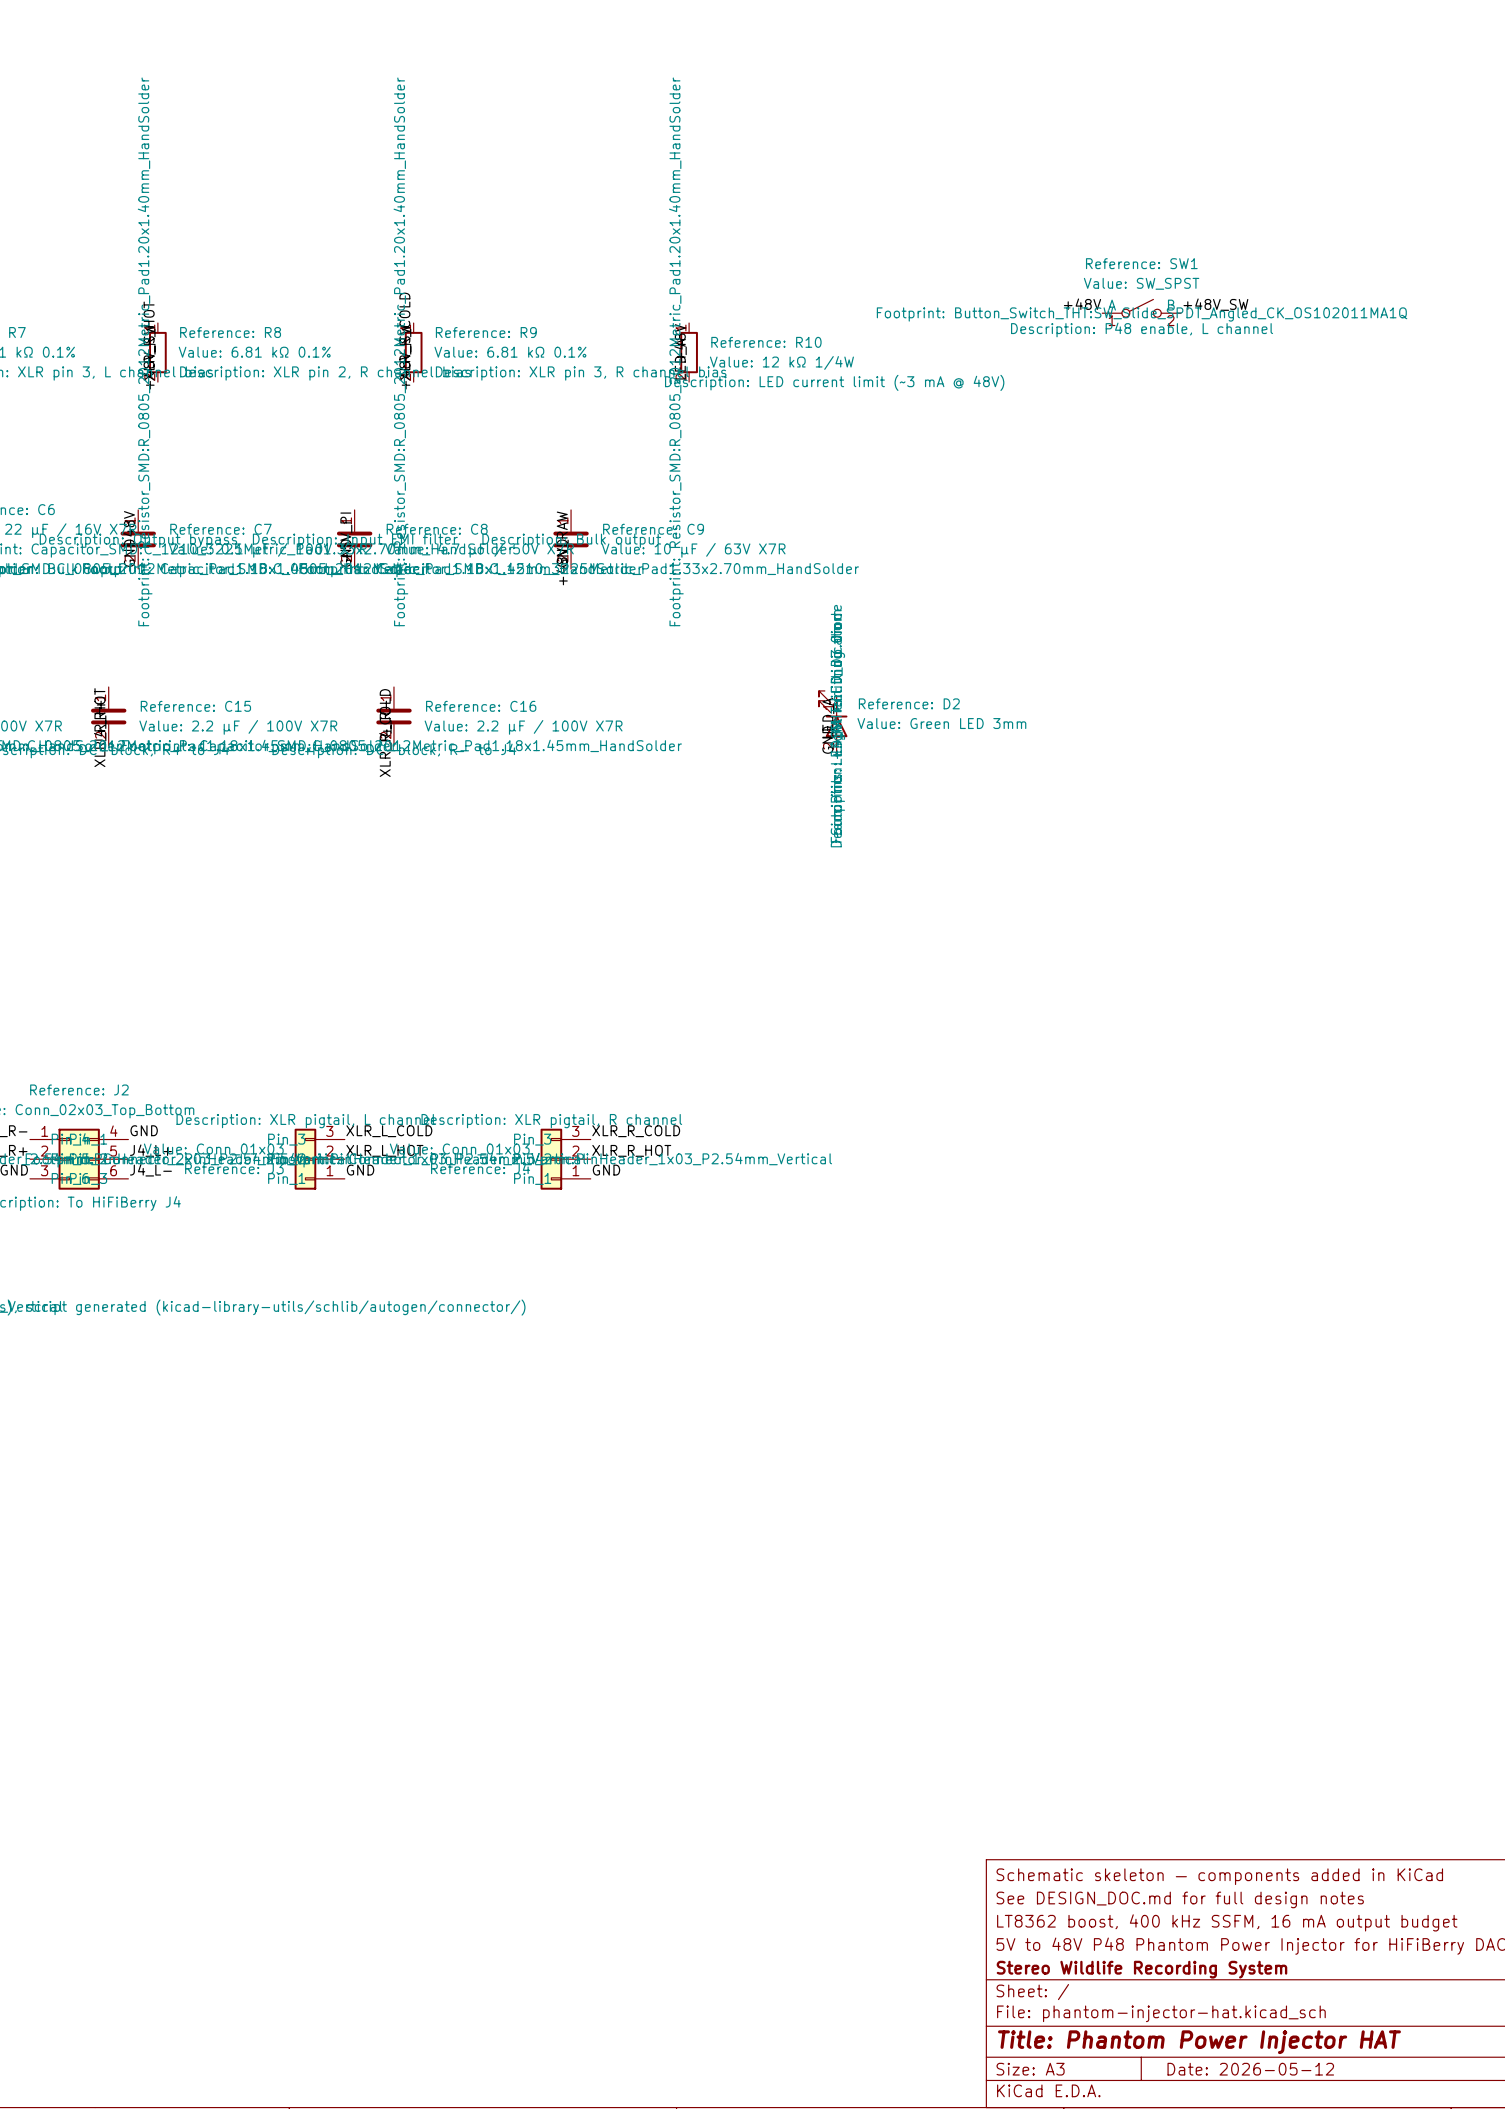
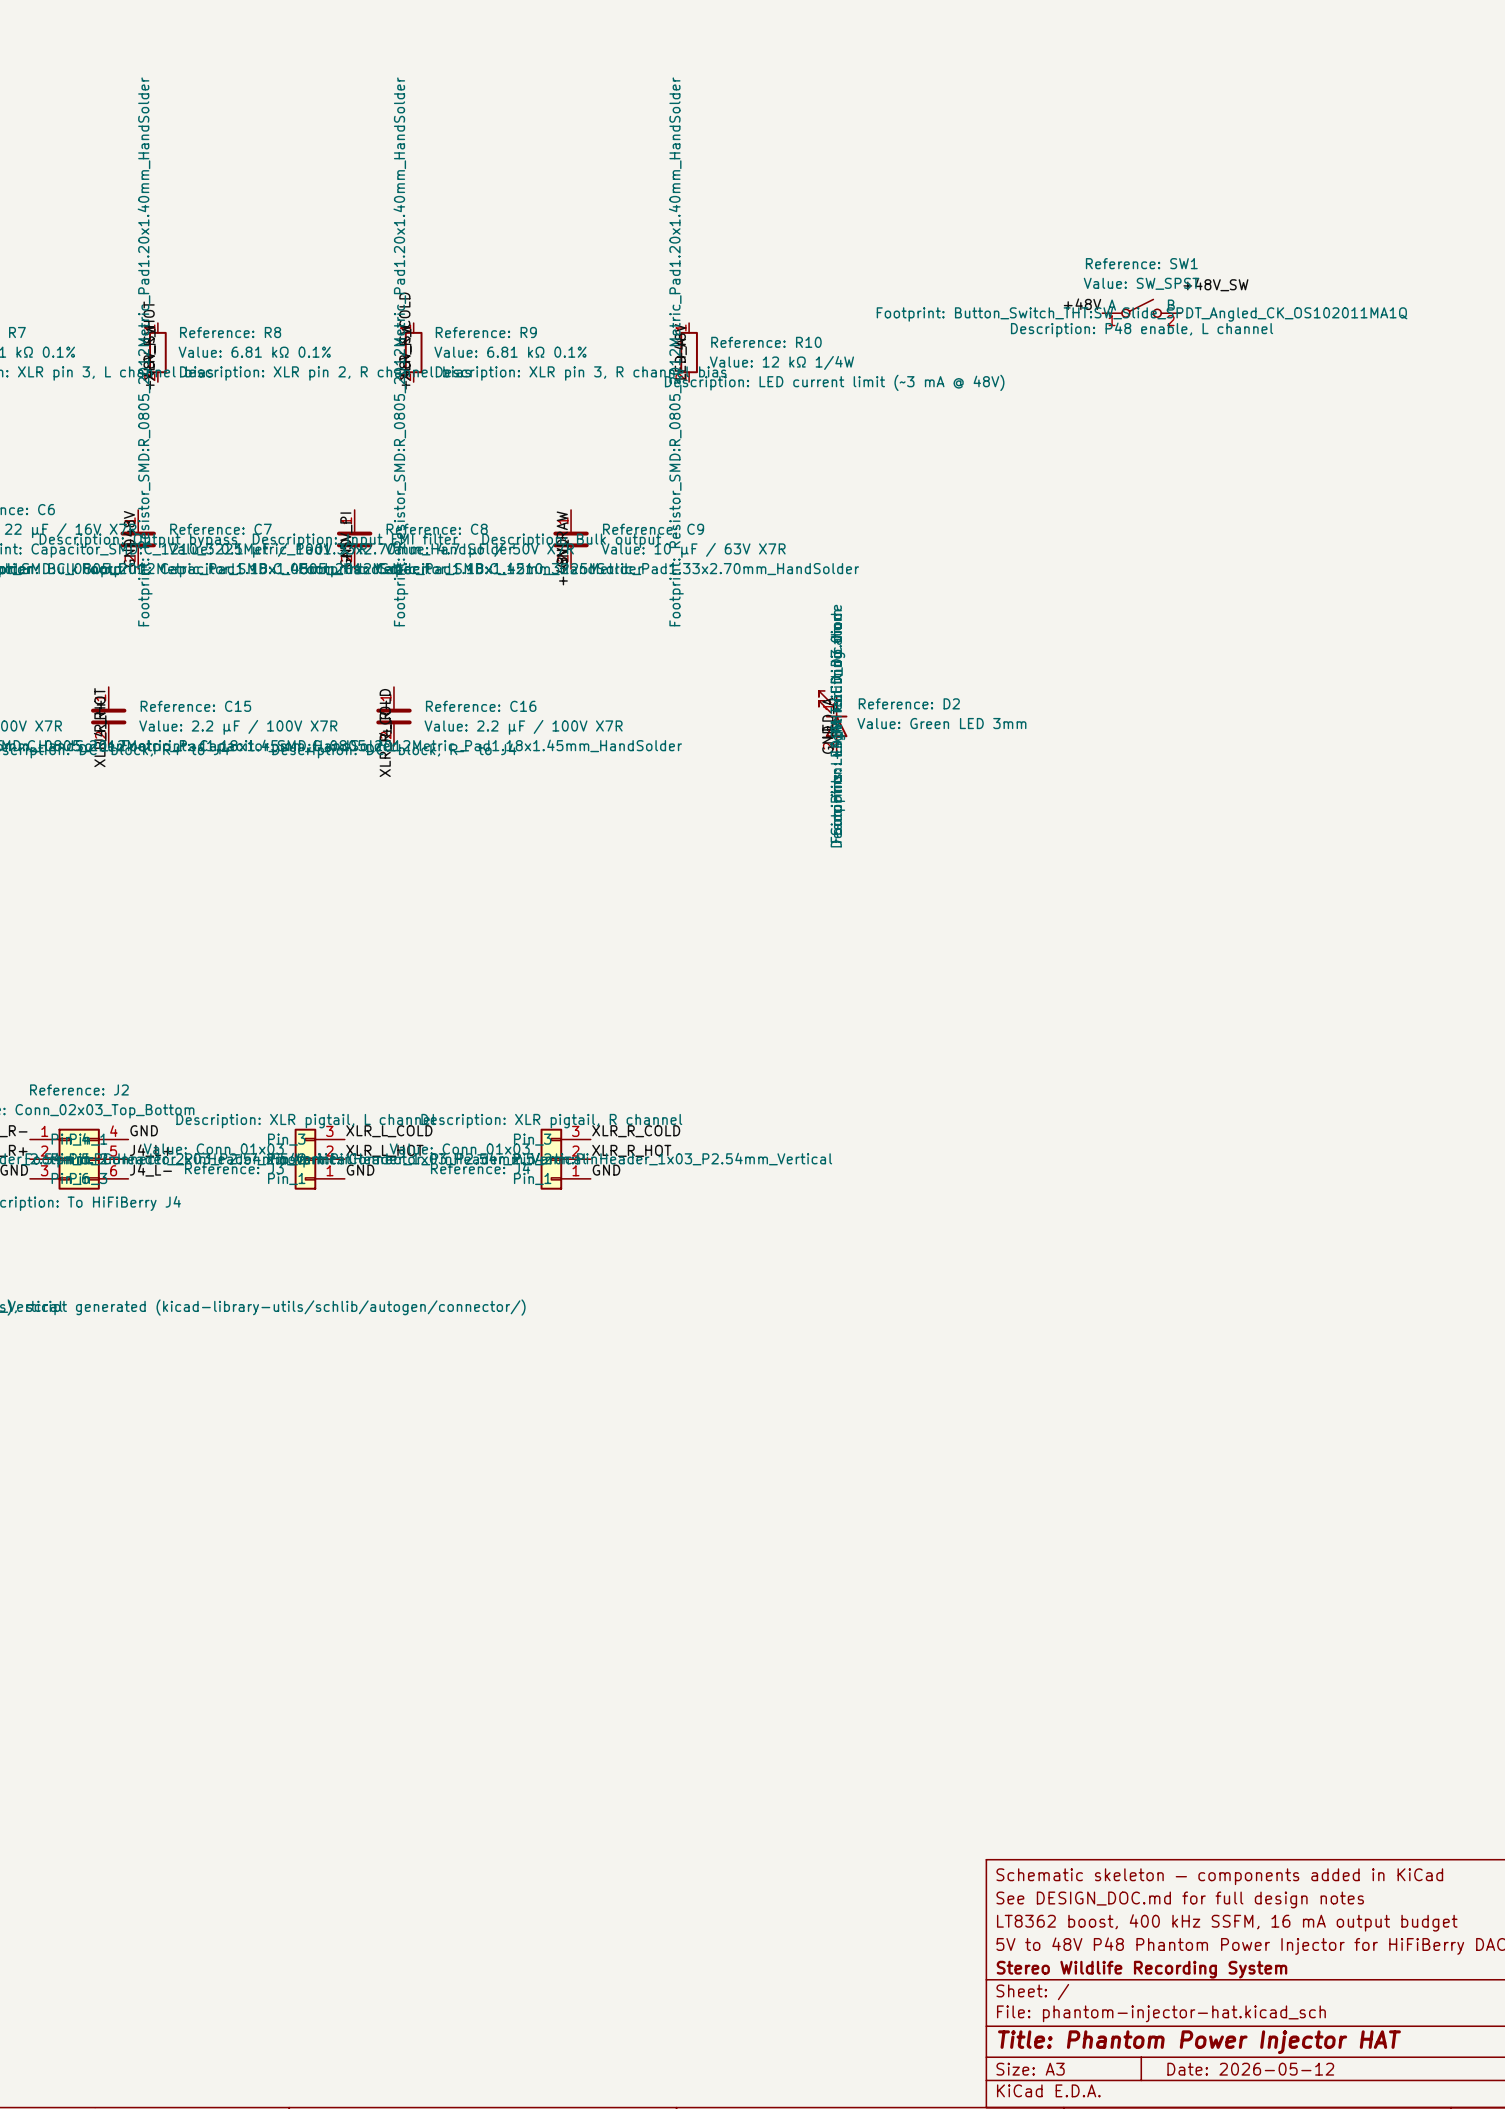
label position: +48V_SW (1215, 304) -> +48V_SW (1215, 284)

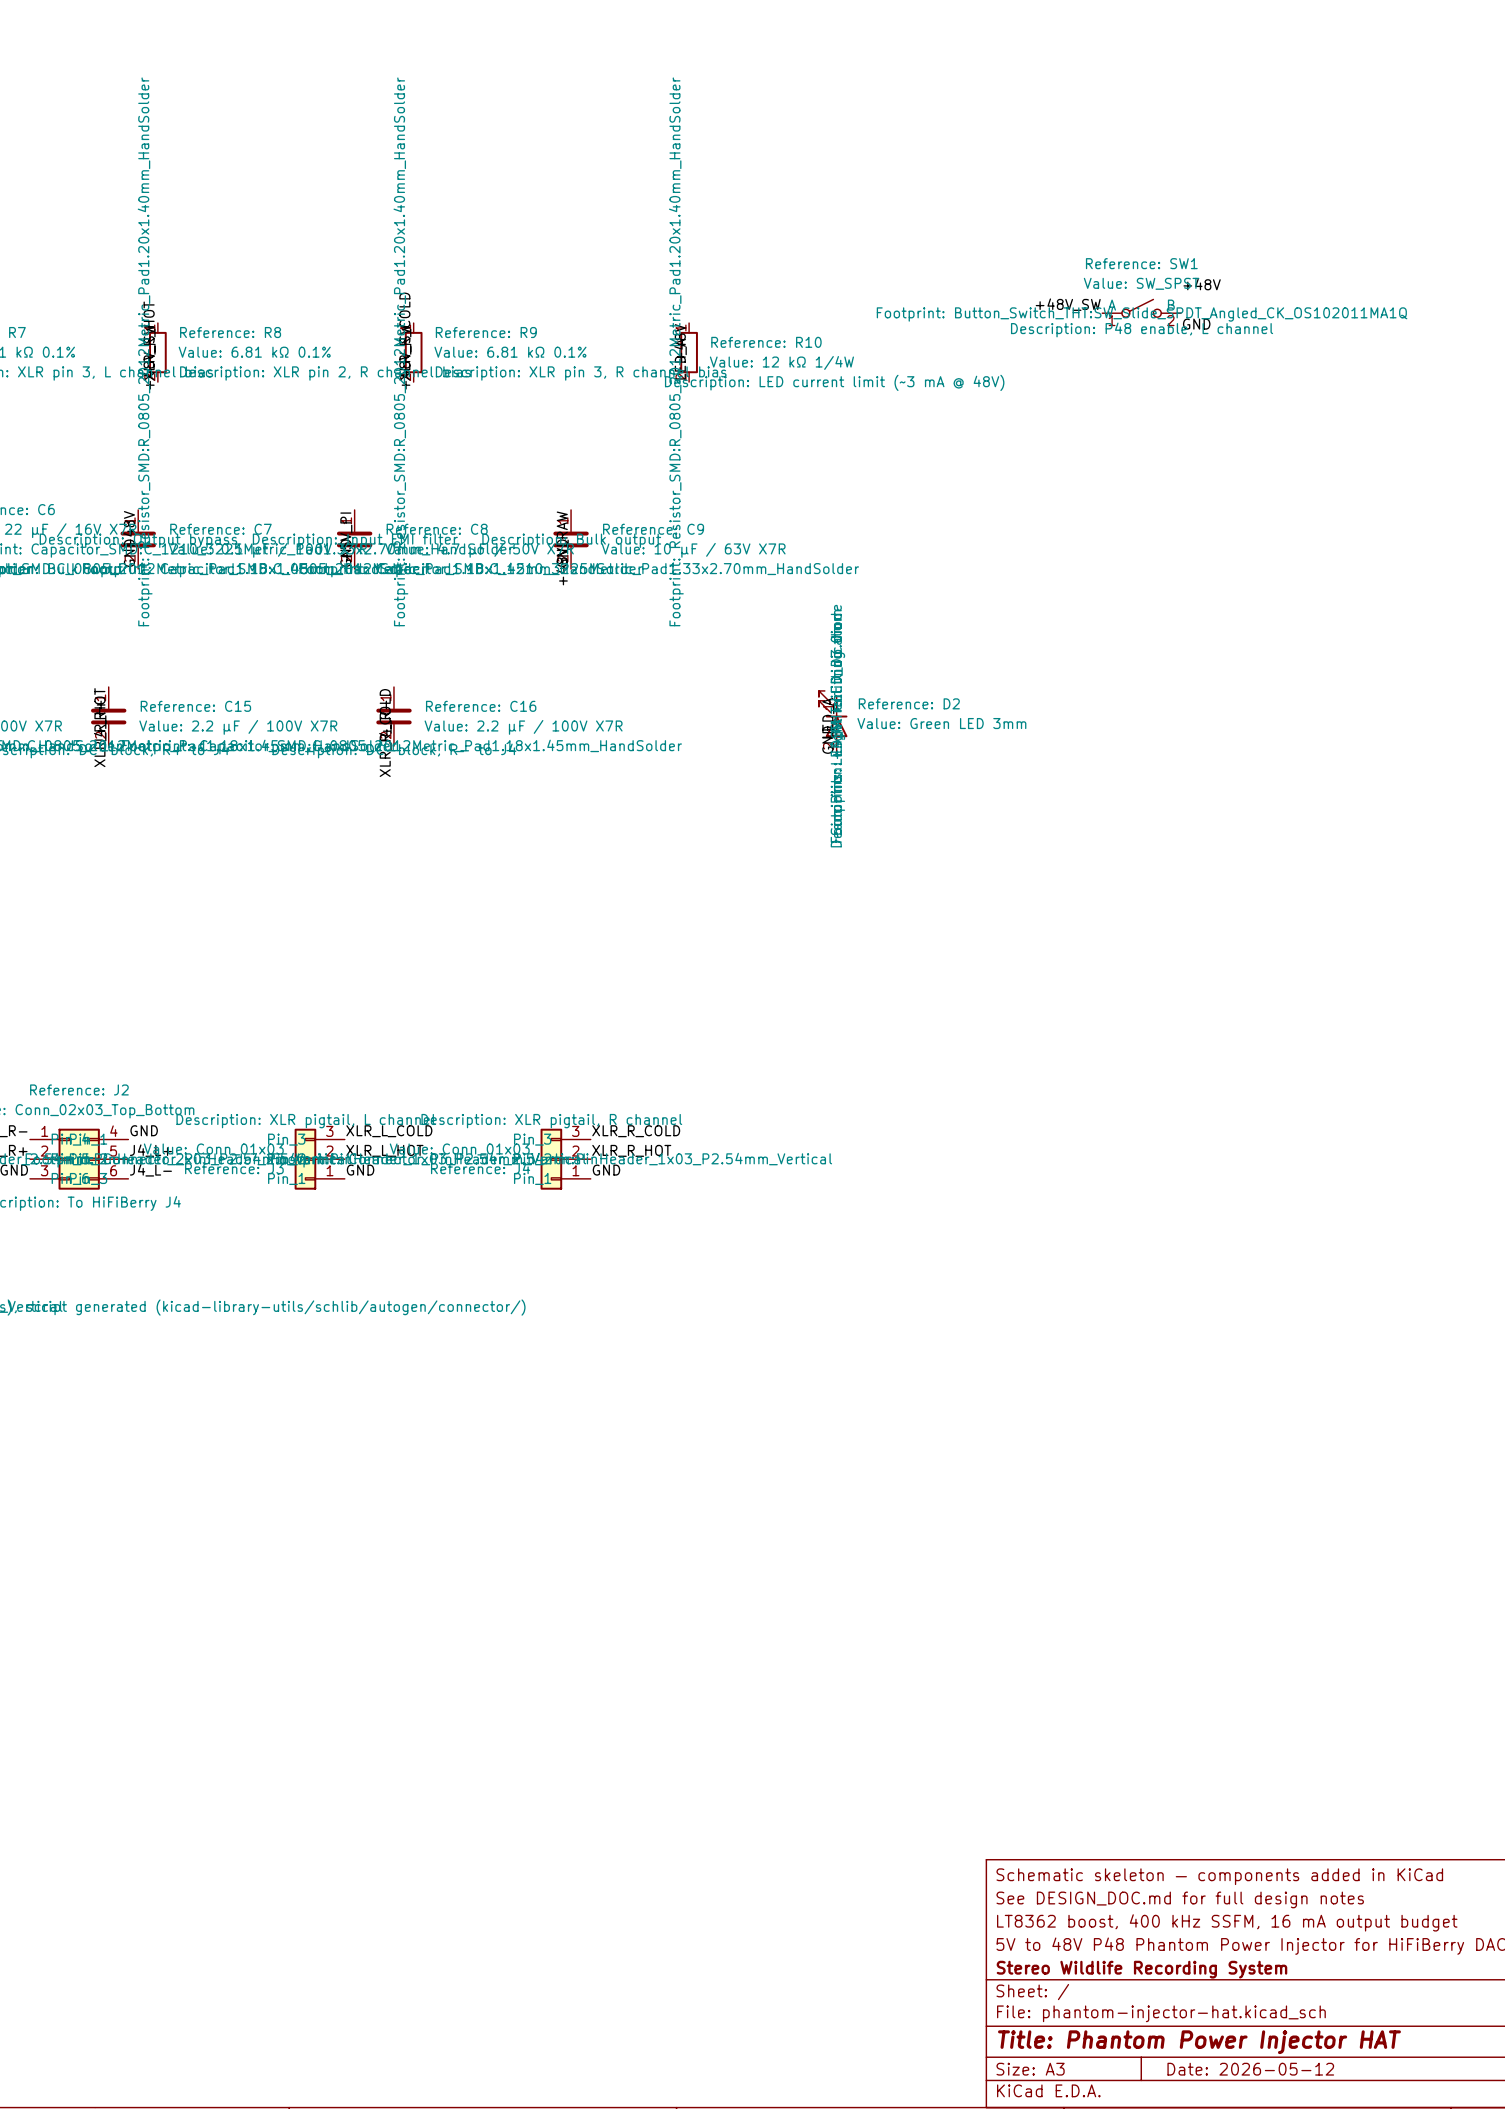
label: +48V_SW (1215, 284) -> +48V (1202, 284)
label: +48V (1082, 304) -> +48V_SW (1068, 304)
label: none -> GND (1196, 324)

